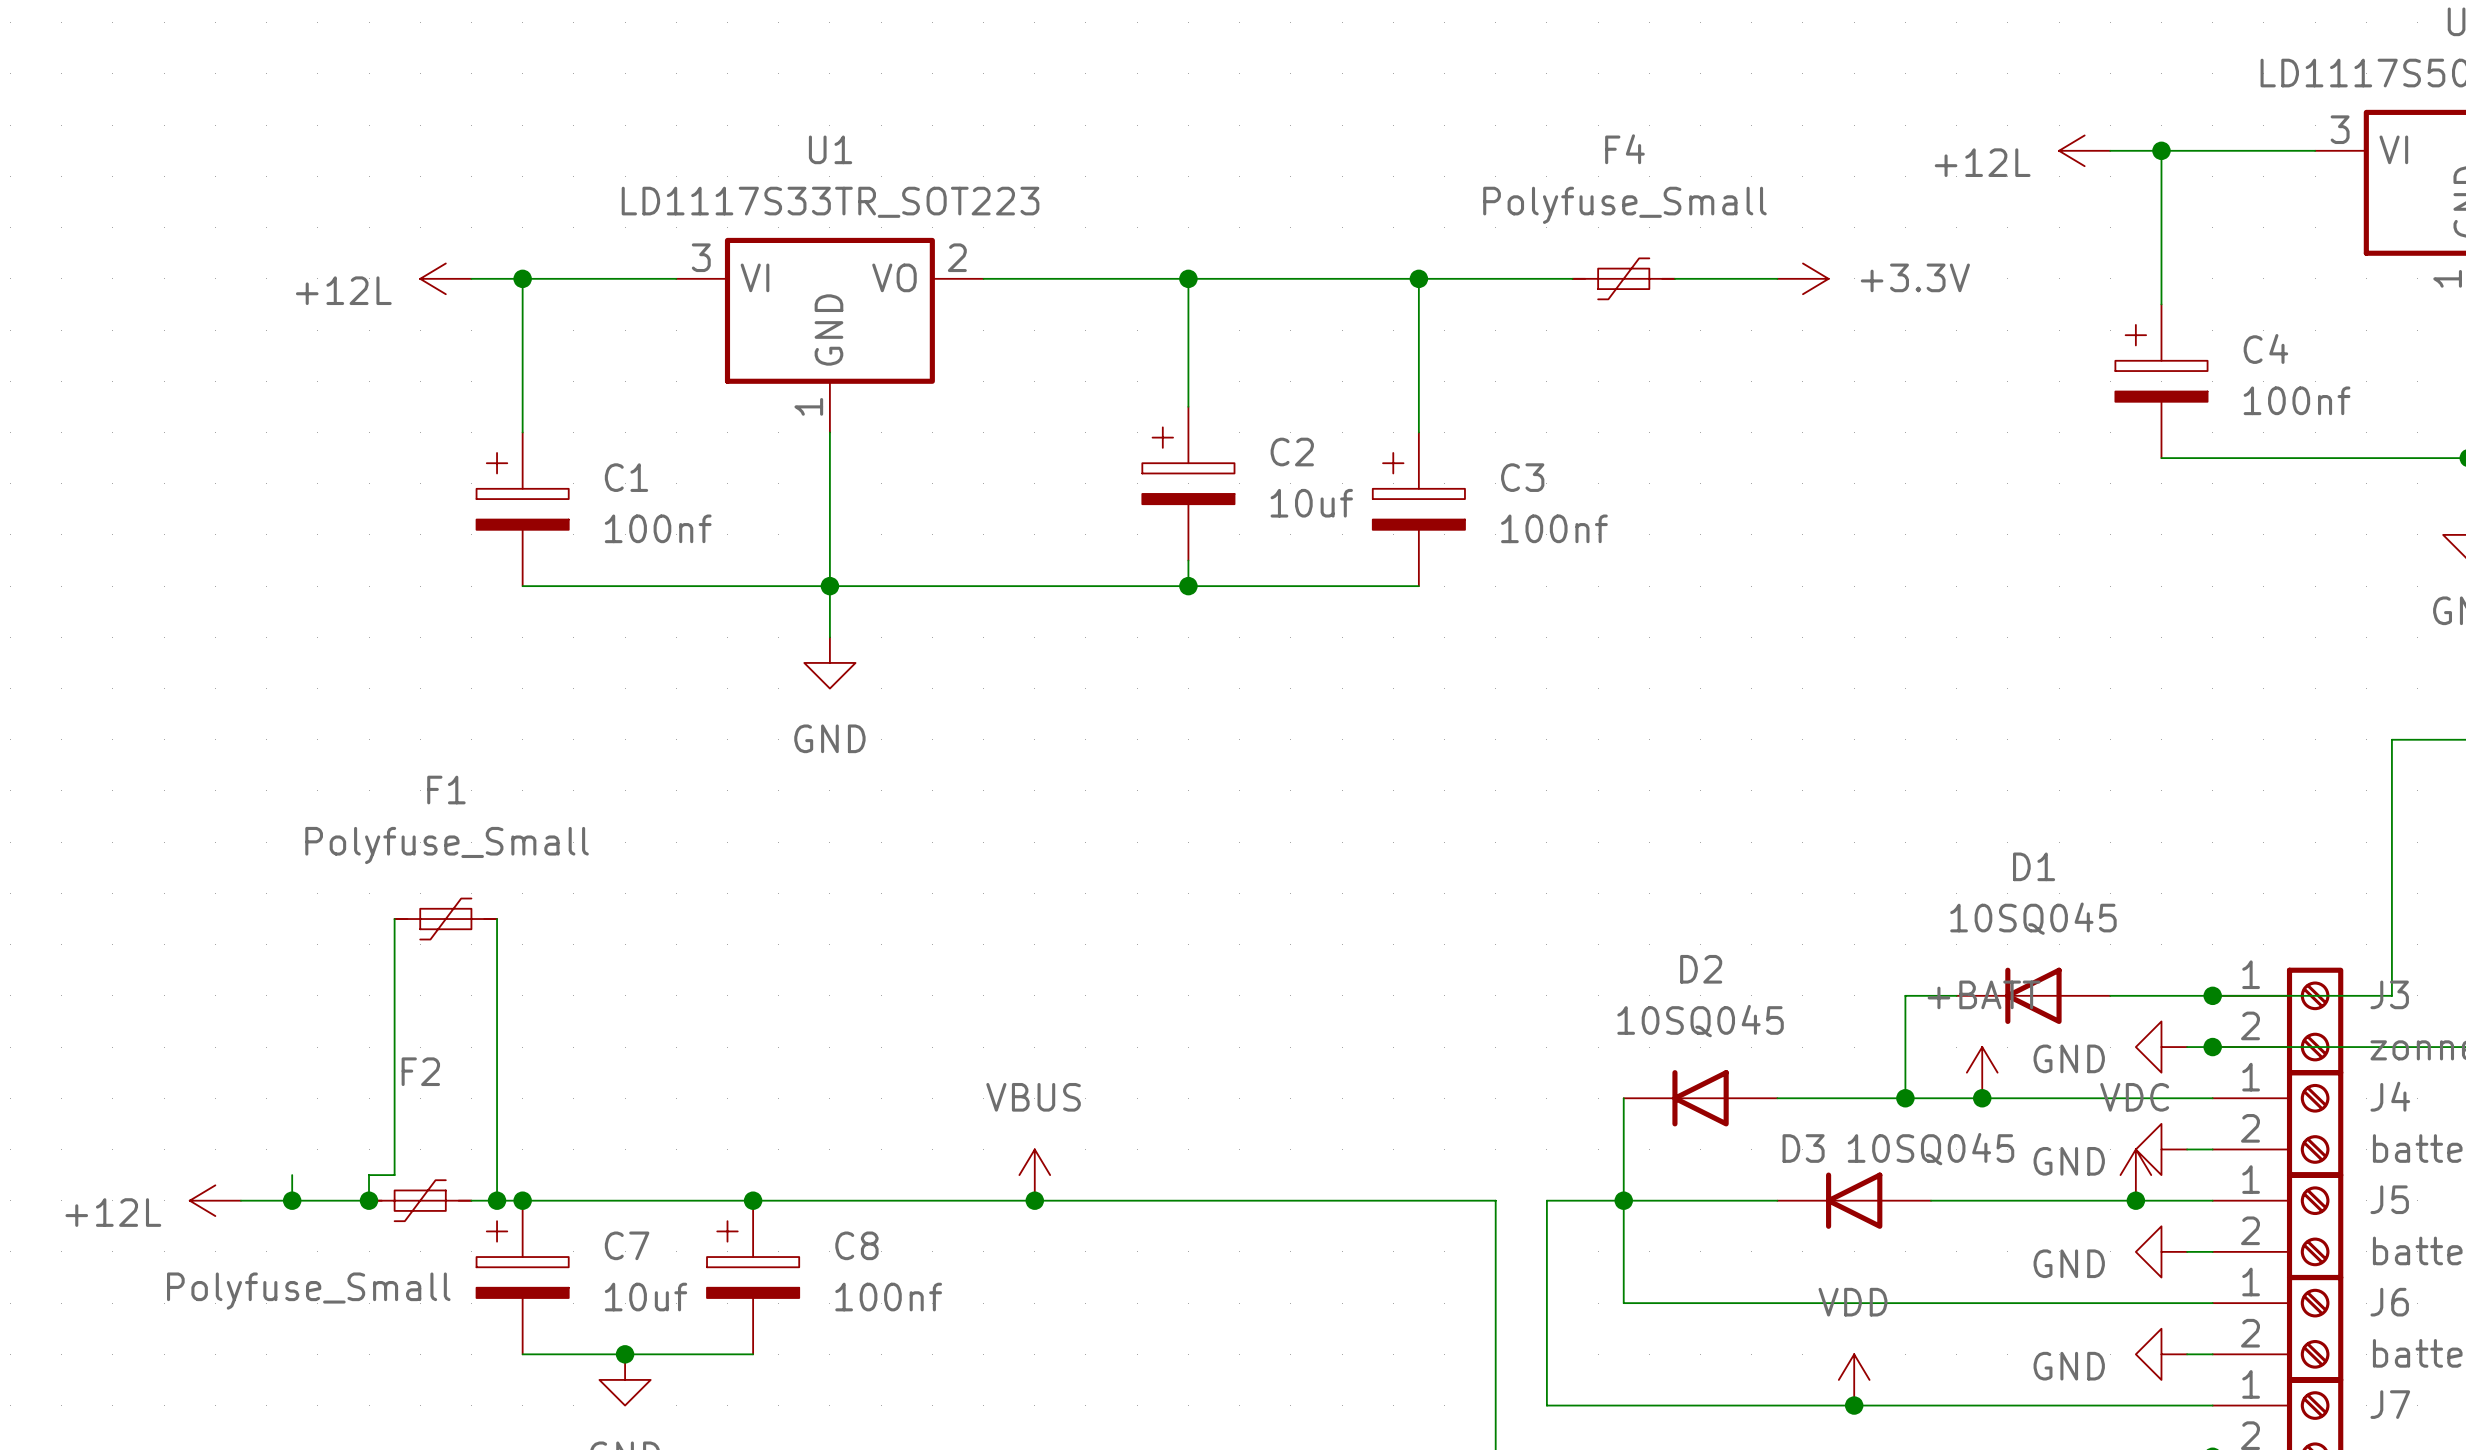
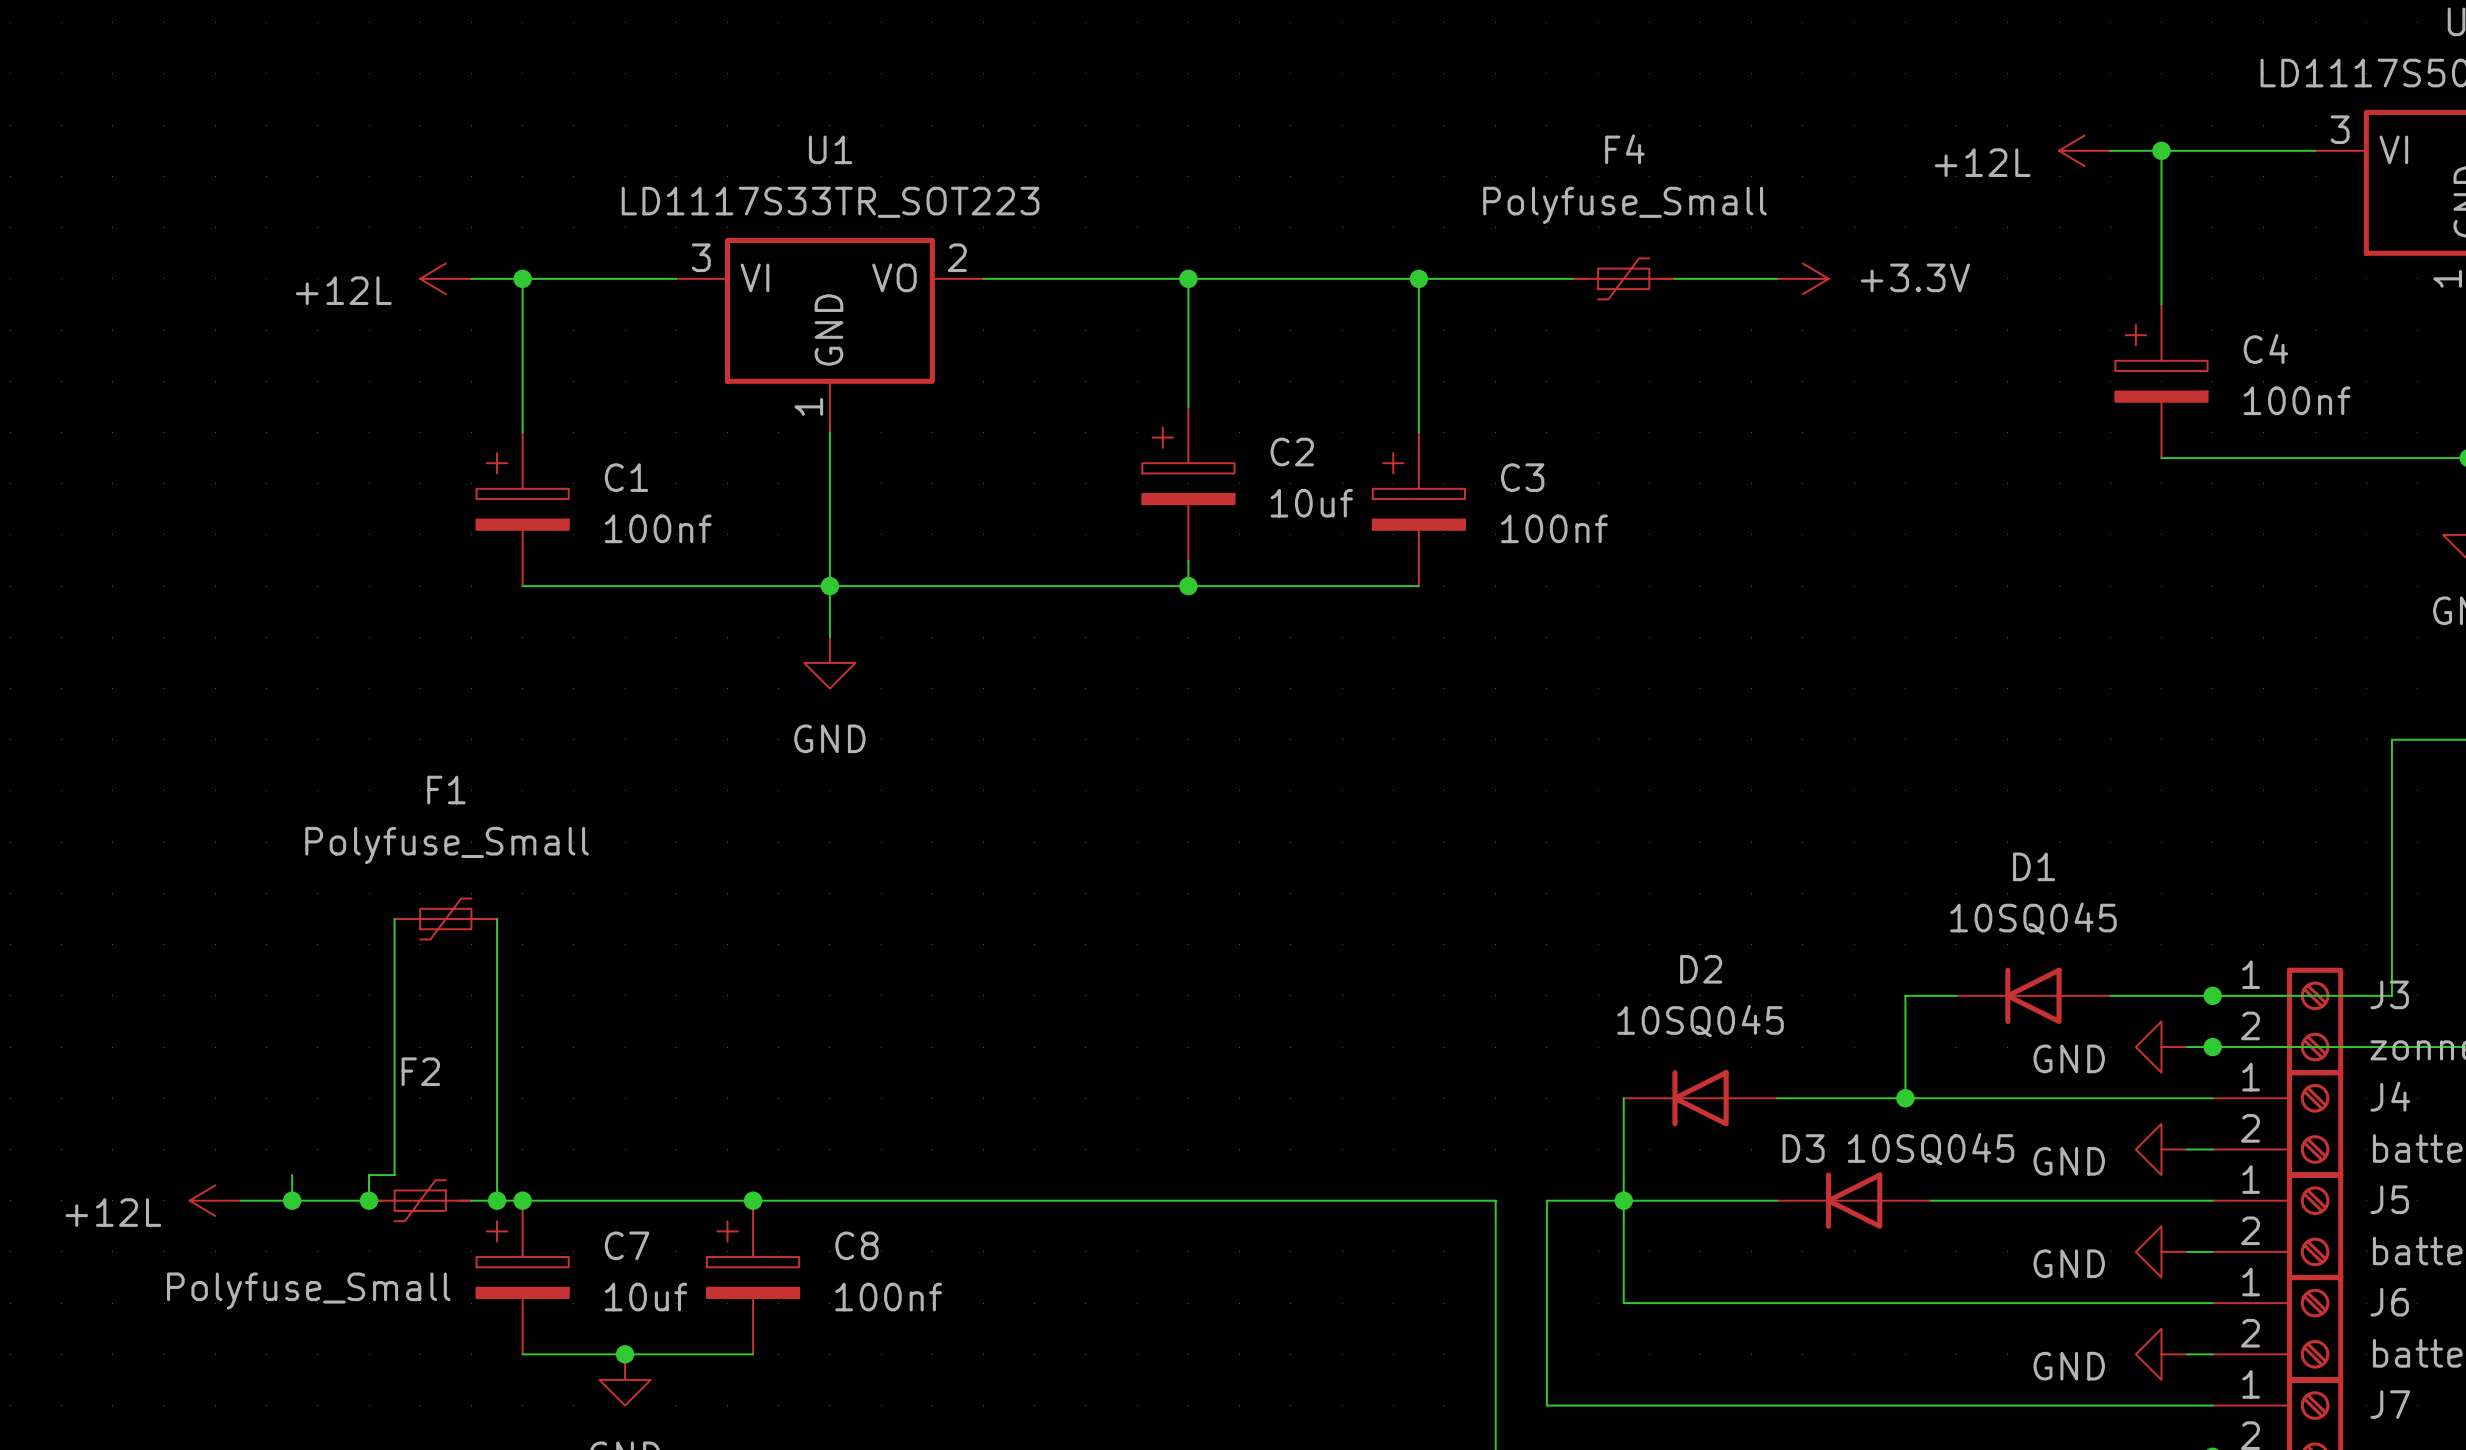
power symbol: +BATT (1982, 1072) -> none
junction: (1982, 1098) -> none
power symbol: VBUS (1034, 1175) -> none
power symbol: VDC (2135, 1175) -> none
junction: (1034, 1200) -> none
junction: (2135, 1200) -> none
power symbol: VDD (1854, 1379) -> none
junction: (1854, 1405) -> none

